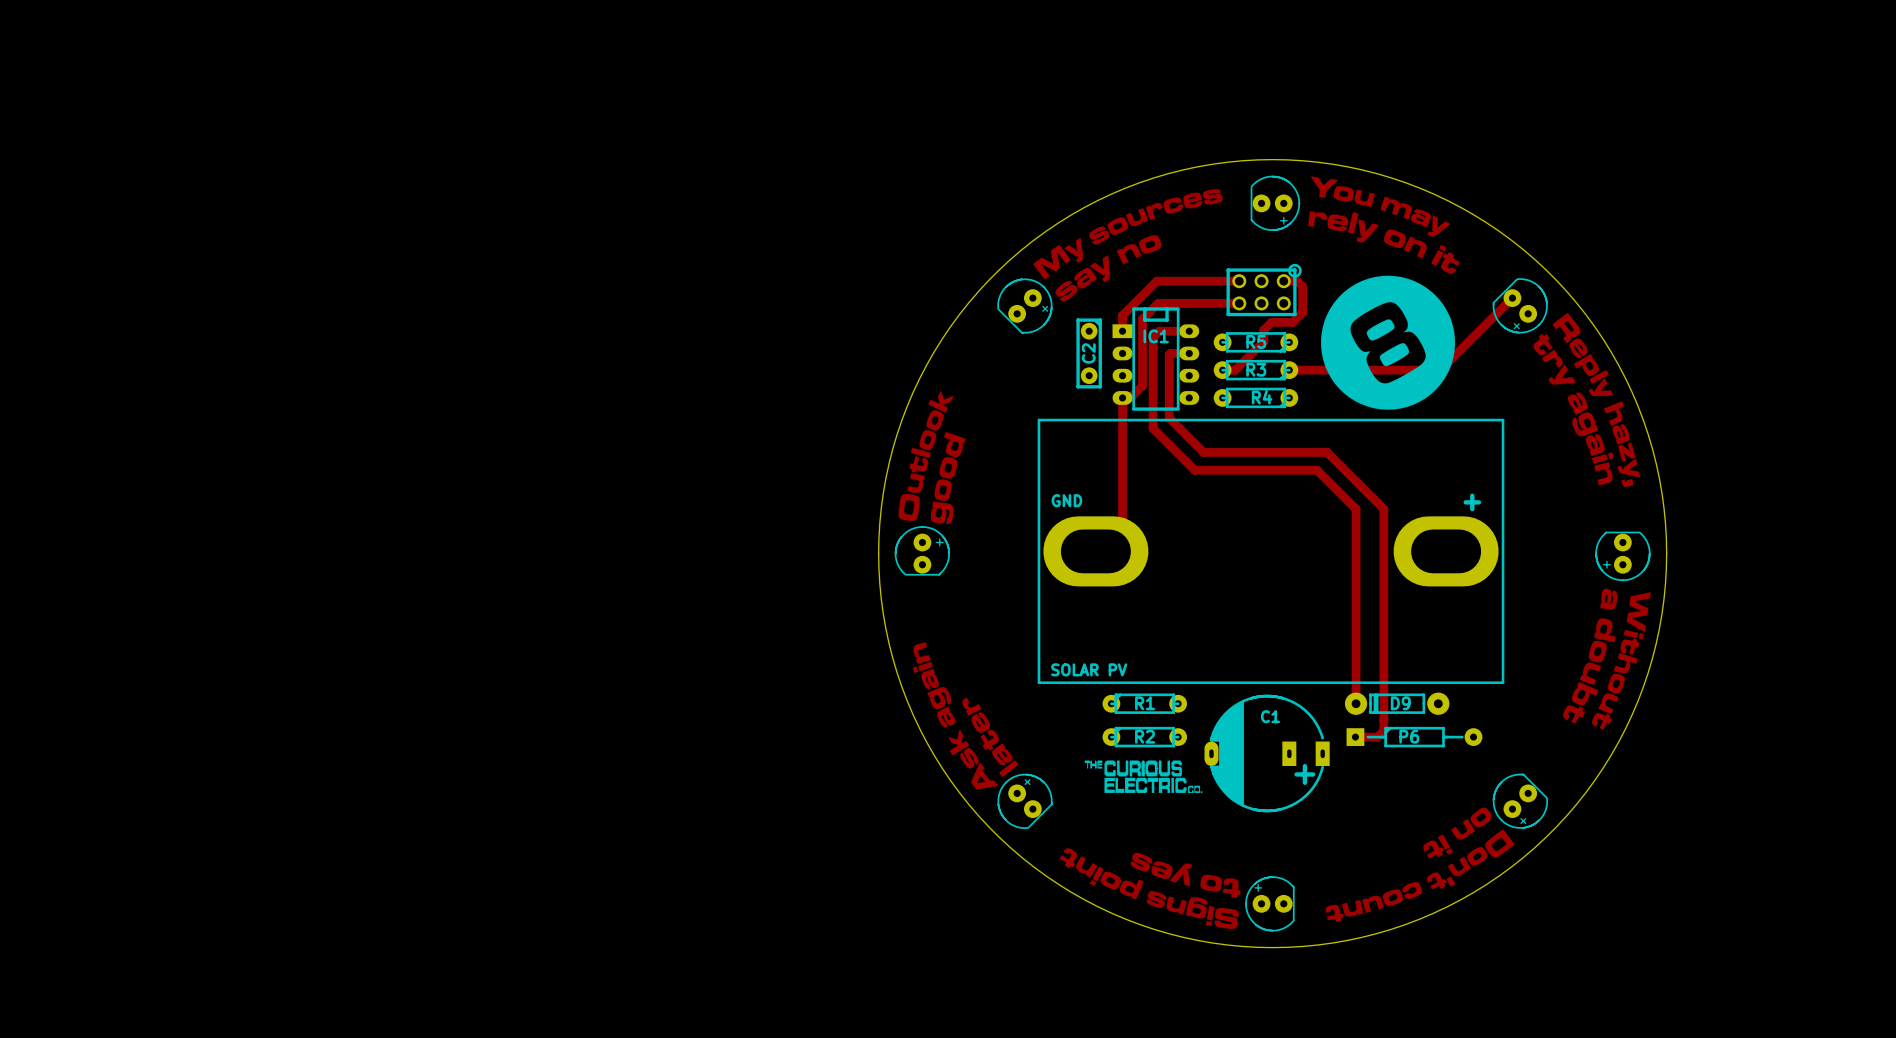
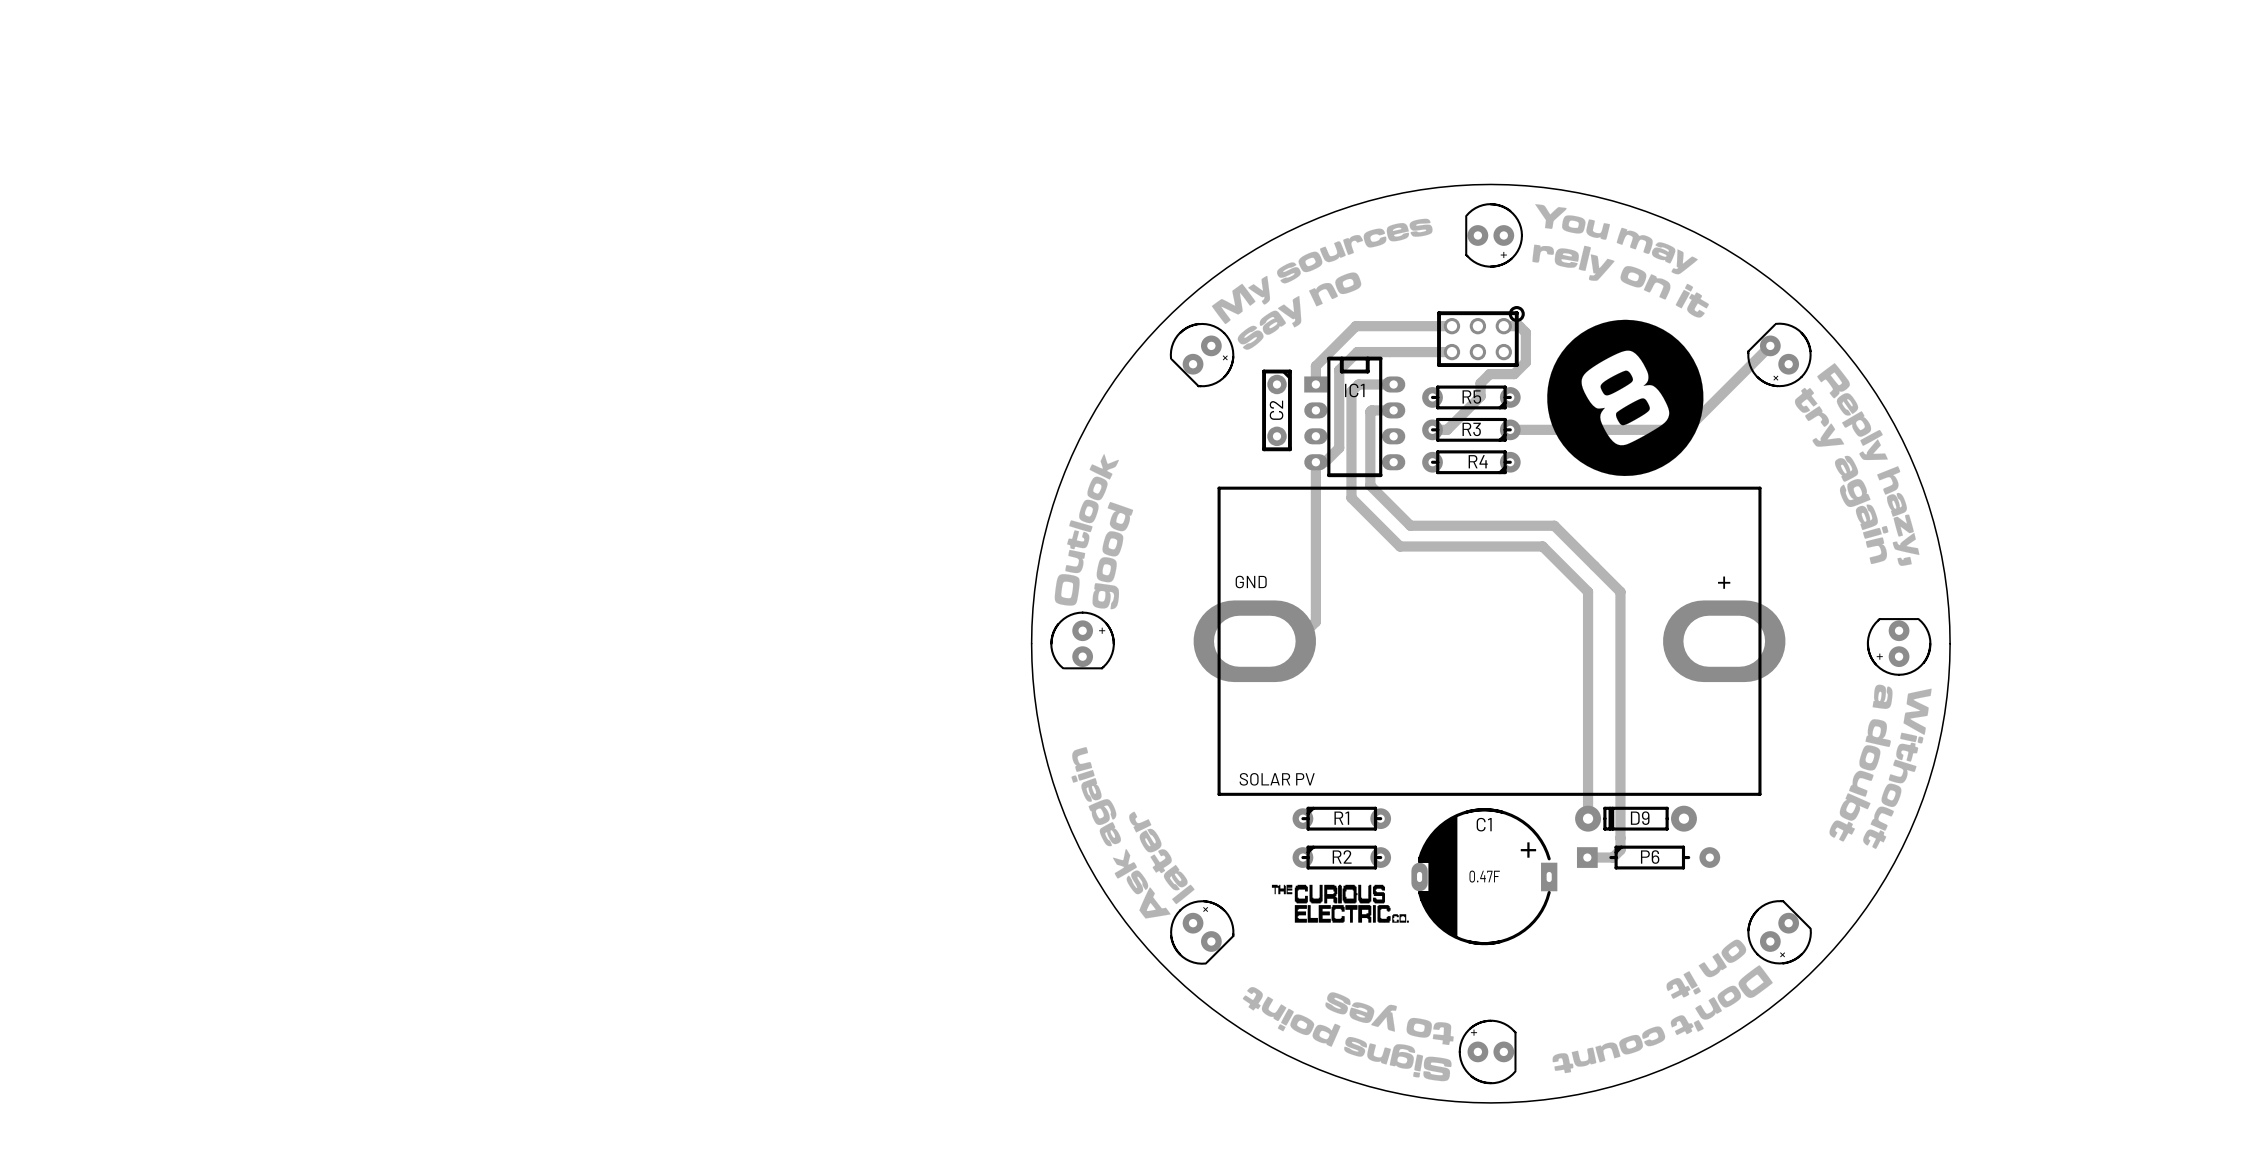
part footprint: [1037, 418, 1505, 685] -> [1193, 486, 1786, 796]
C1 footprint: [1204, 694, 1330, 813] -> [1411, 808, 1558, 946]
P6 footprint: [1346, 726, 1483, 748] -> [1576, 845, 1721, 870]
C1 value: none -> 0.47F (1484, 876)

